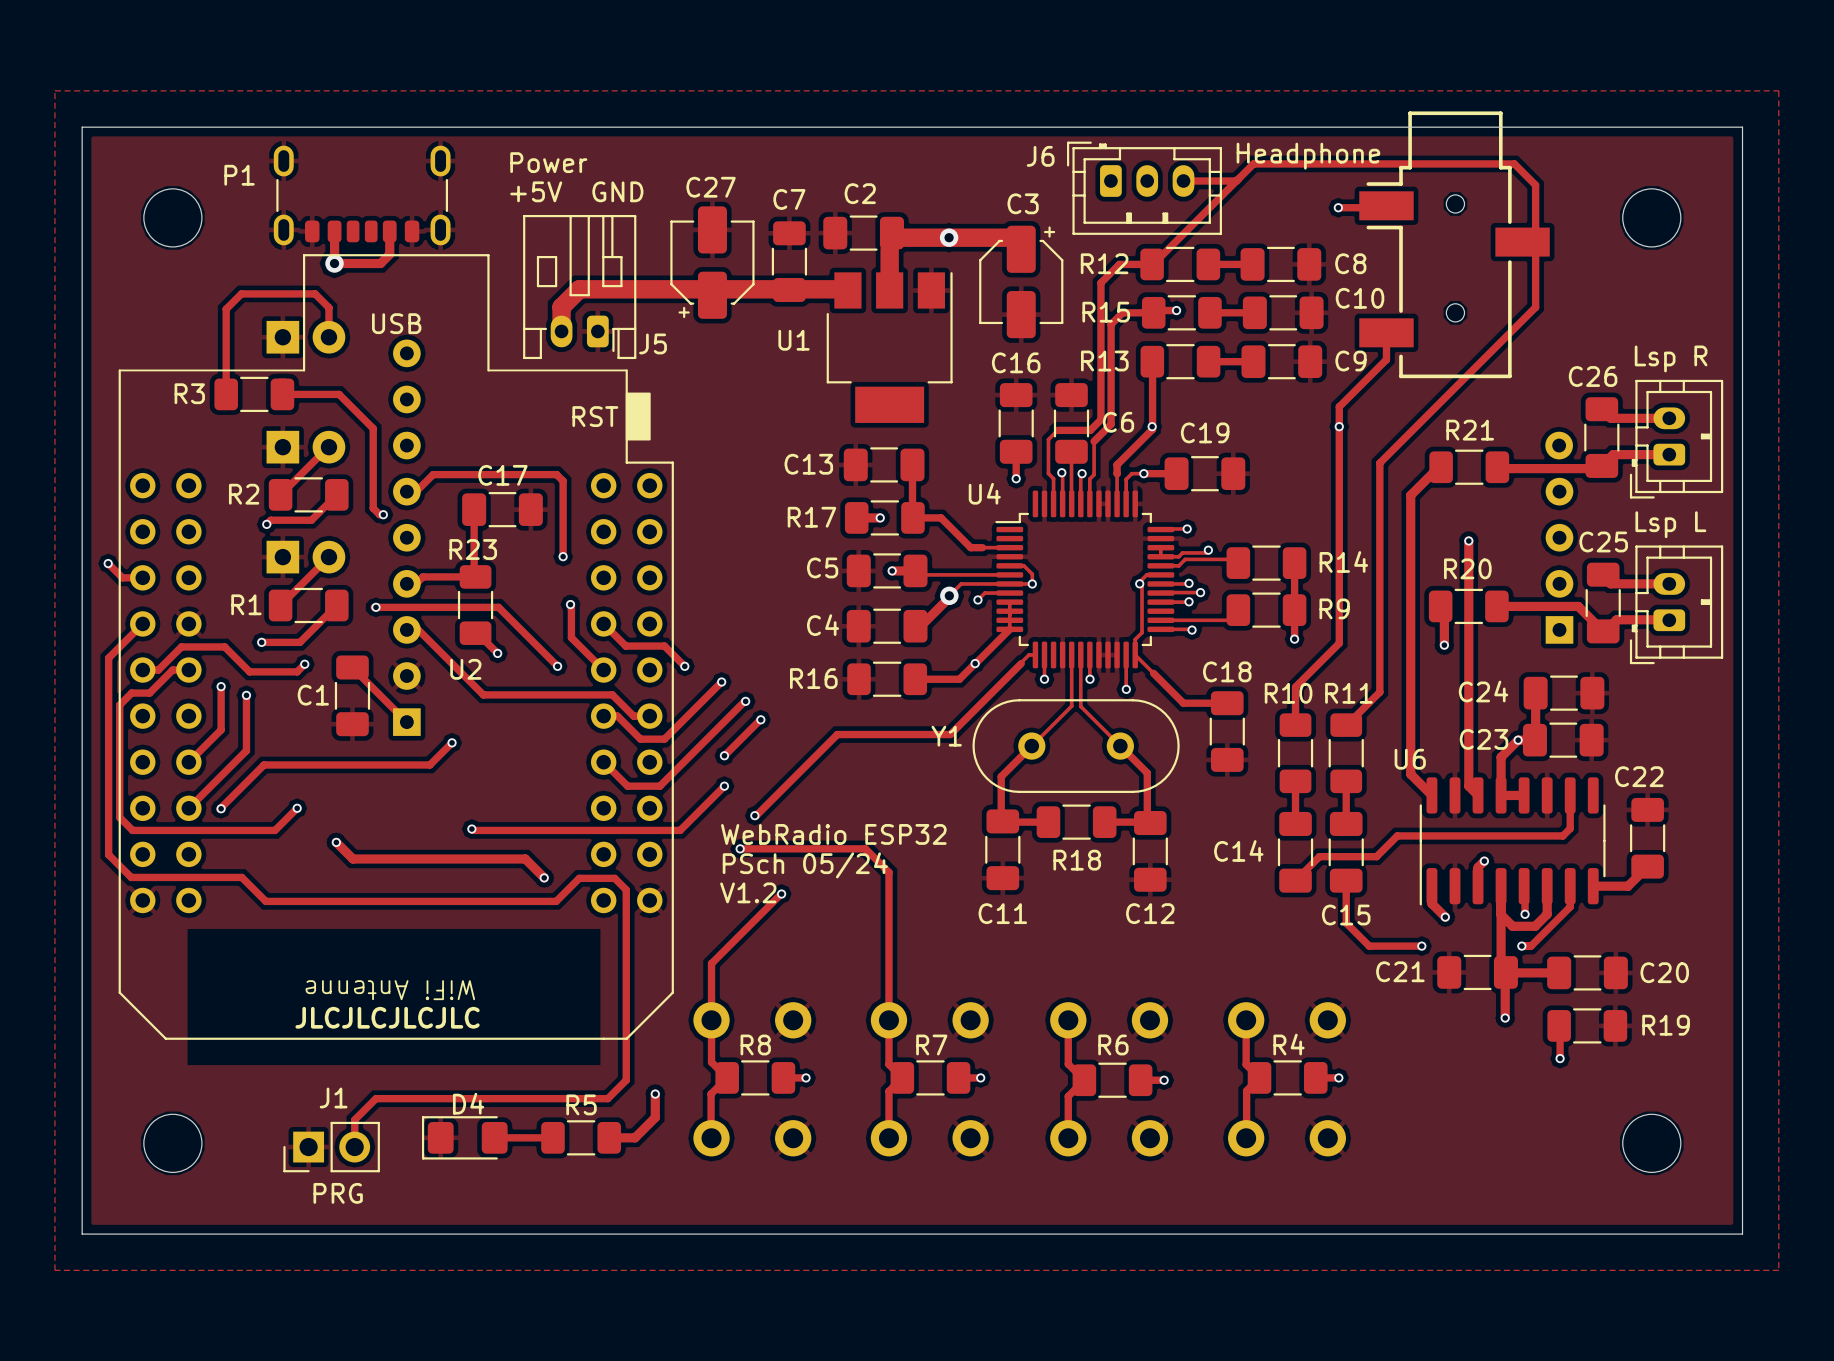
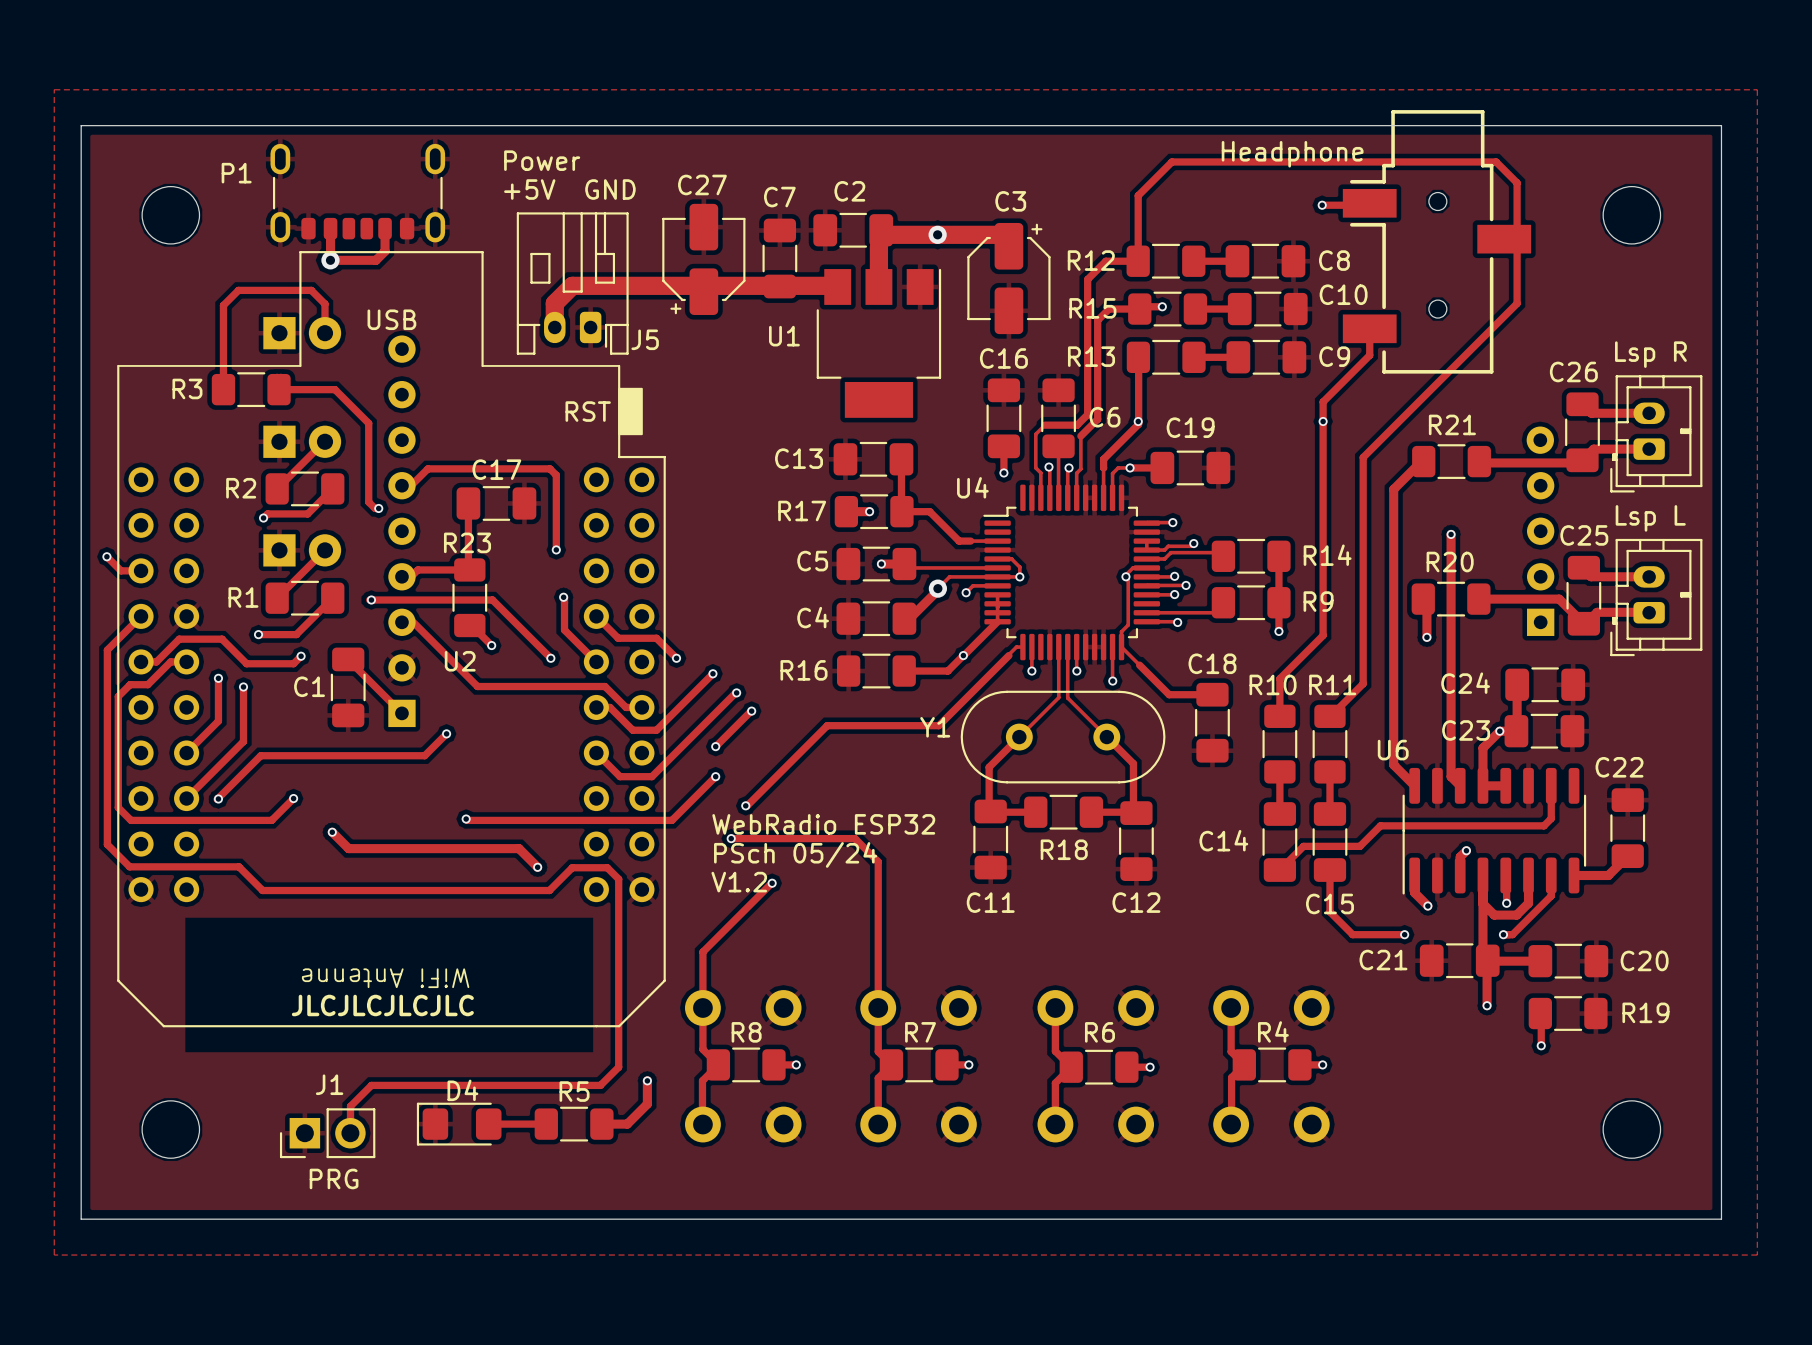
track: (1253, 163) (1152, 264) -> (1238, 161) (1171, 161) (1138, 195) (1138, 261)
track: (1183, 181) (1236, 181) -> none
J6: (1144, 188) -> none

